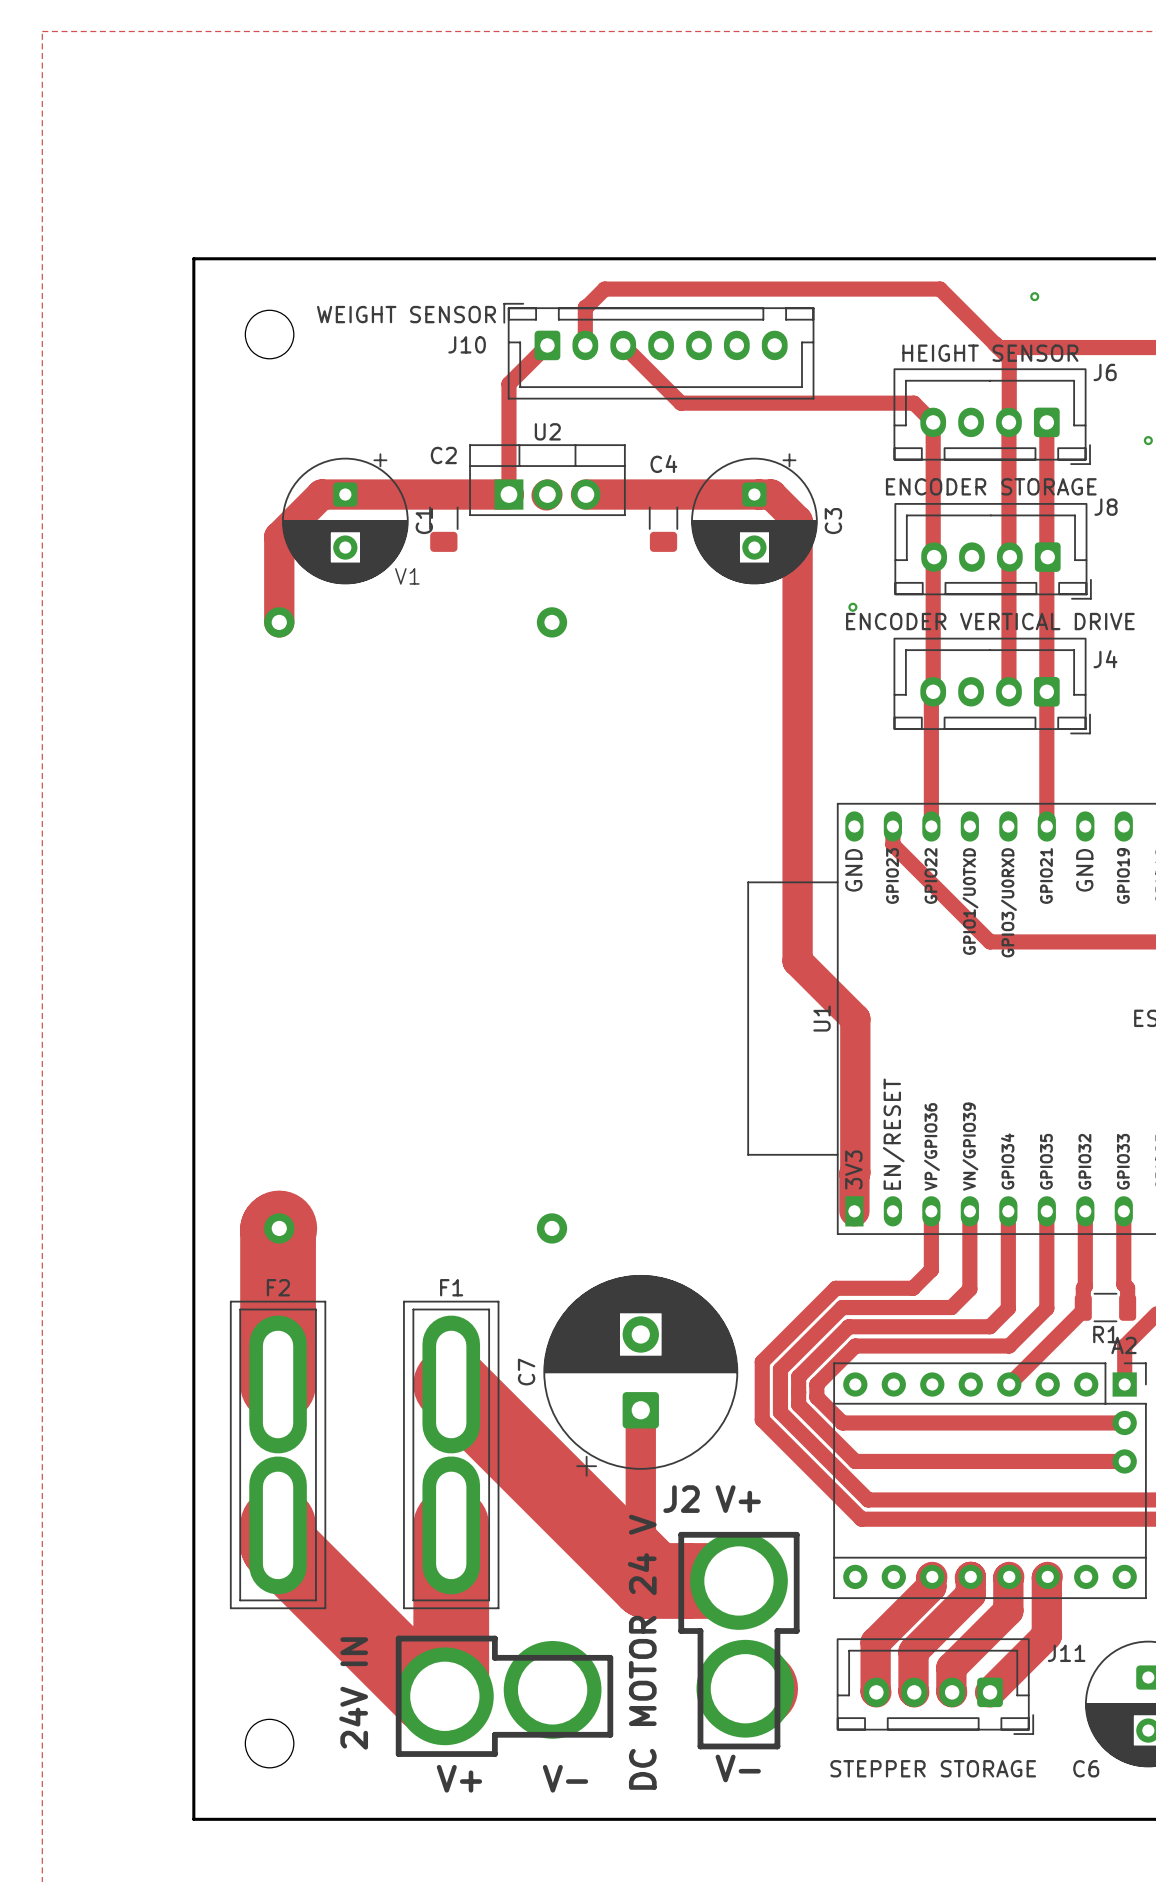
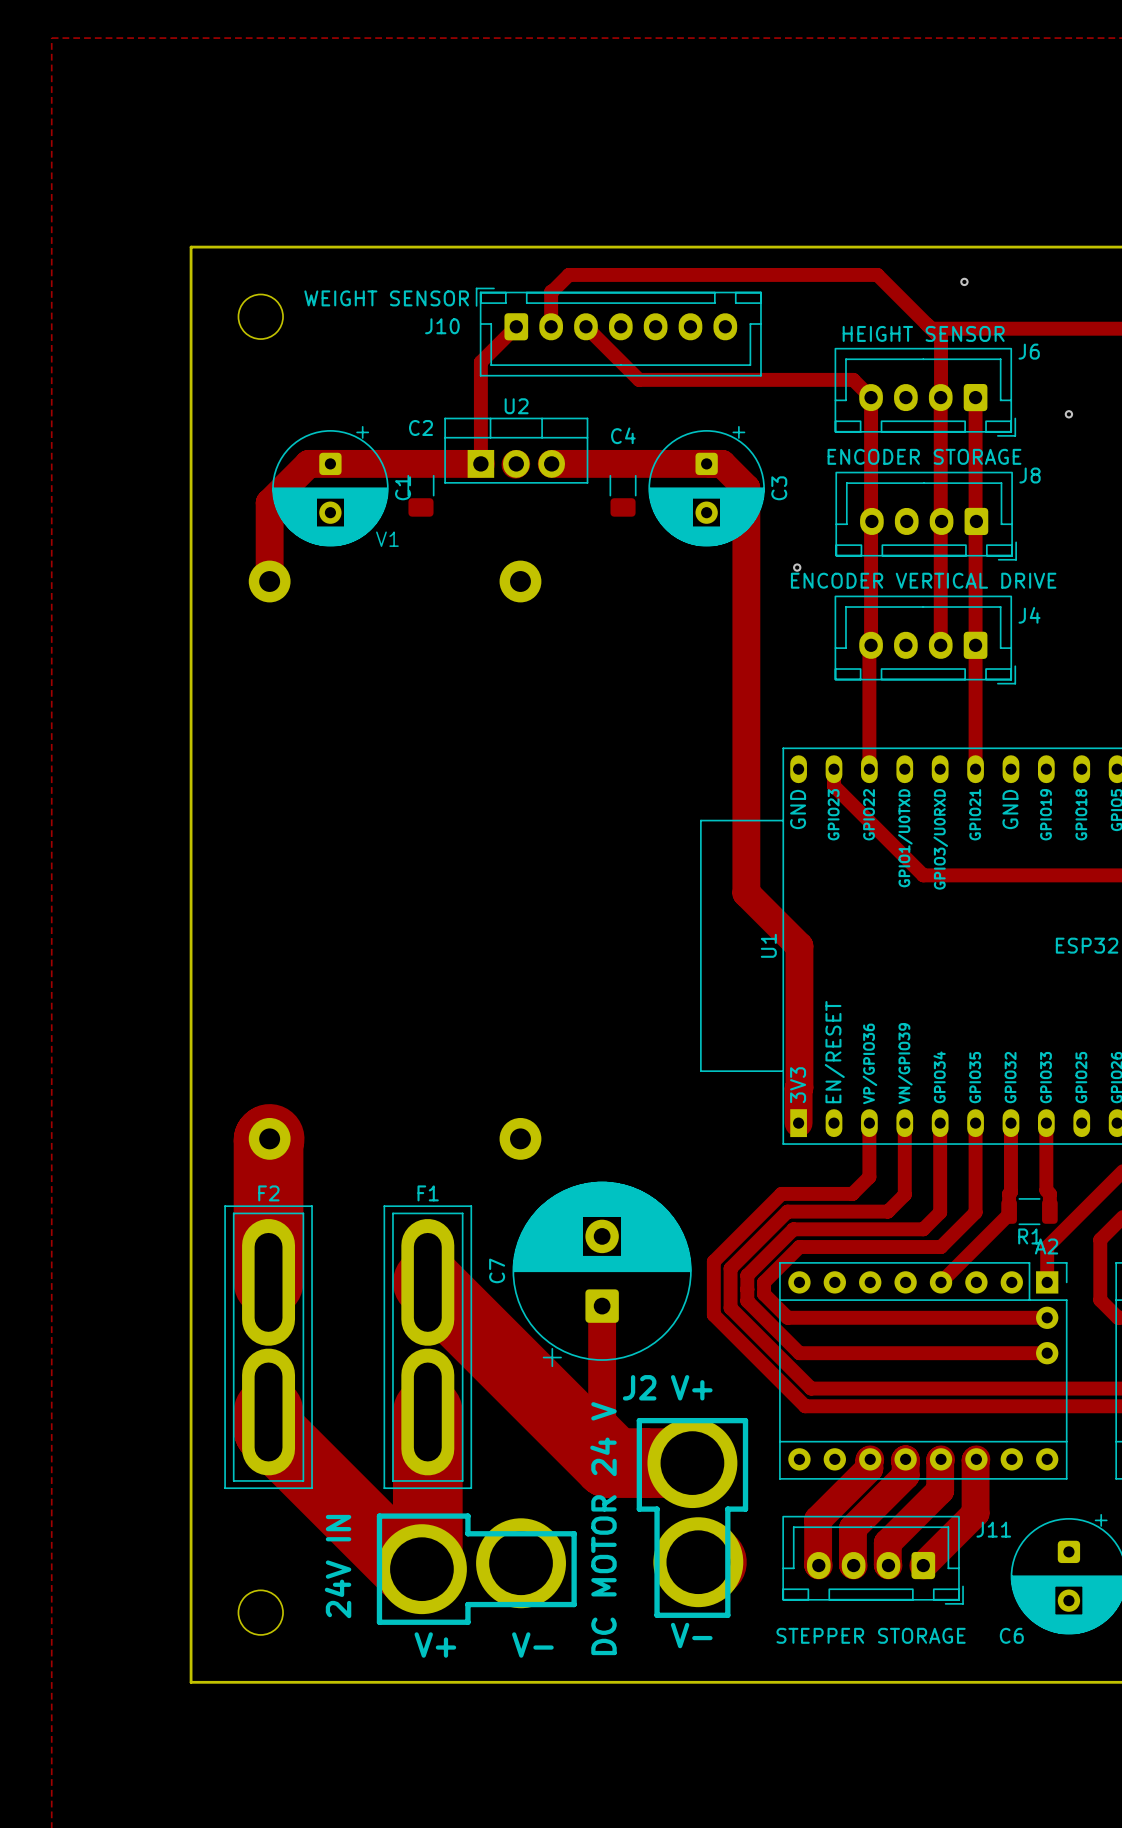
V1 footprint: [264, 607, 568, 1244] -> [248, 560, 542, 1160]

